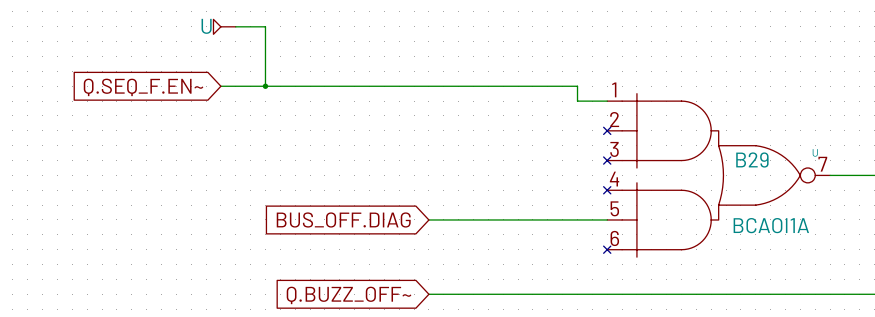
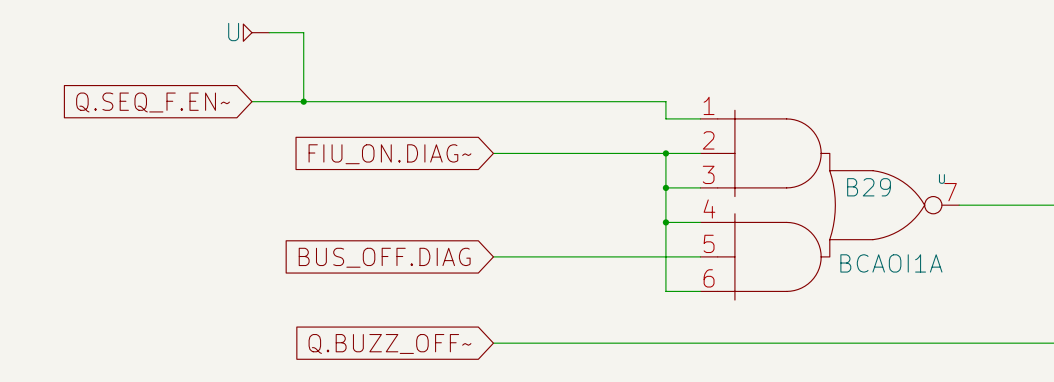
global label: none -> FIU_ON.DIAG~ (390, 154)
wire: none -> (493, 153) (700, 153)
wire: none -> (665, 153) (665, 291) (700, 291)
junction: none -> (665, 153)
no-connect mark: (607, 130) -> none
wire: none -> (665, 187) (700, 187)
junction: none -> (665, 187)
no-connect mark: (607, 160) -> none
wire: none -> (665, 222) (700, 222)
junction: none -> (665, 222)
no-connect mark: (607, 190) -> none
no-connect mark: (607, 249) -> none

